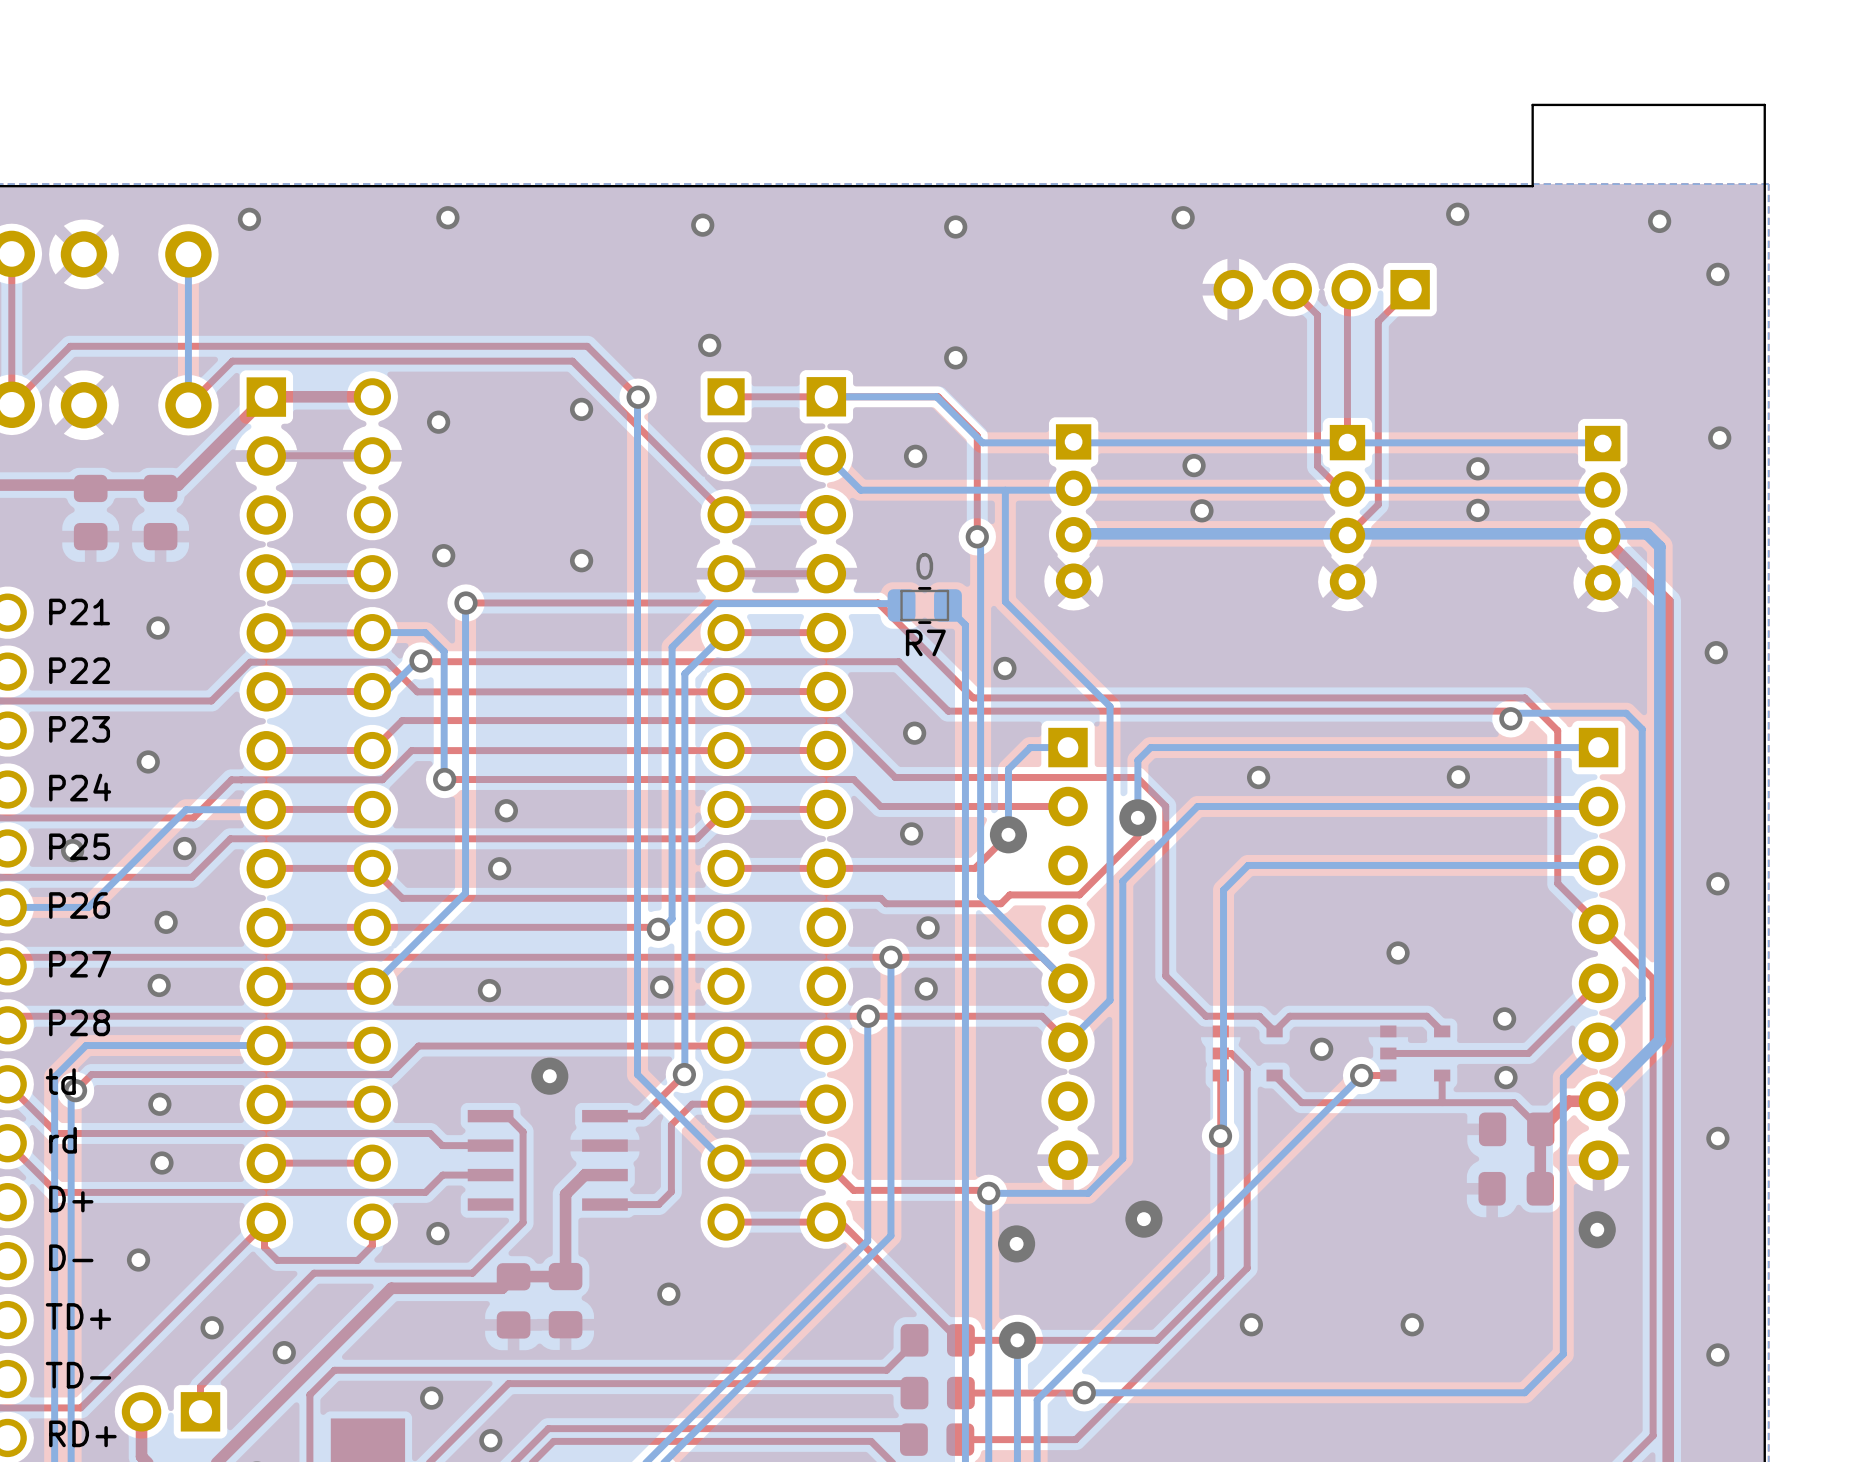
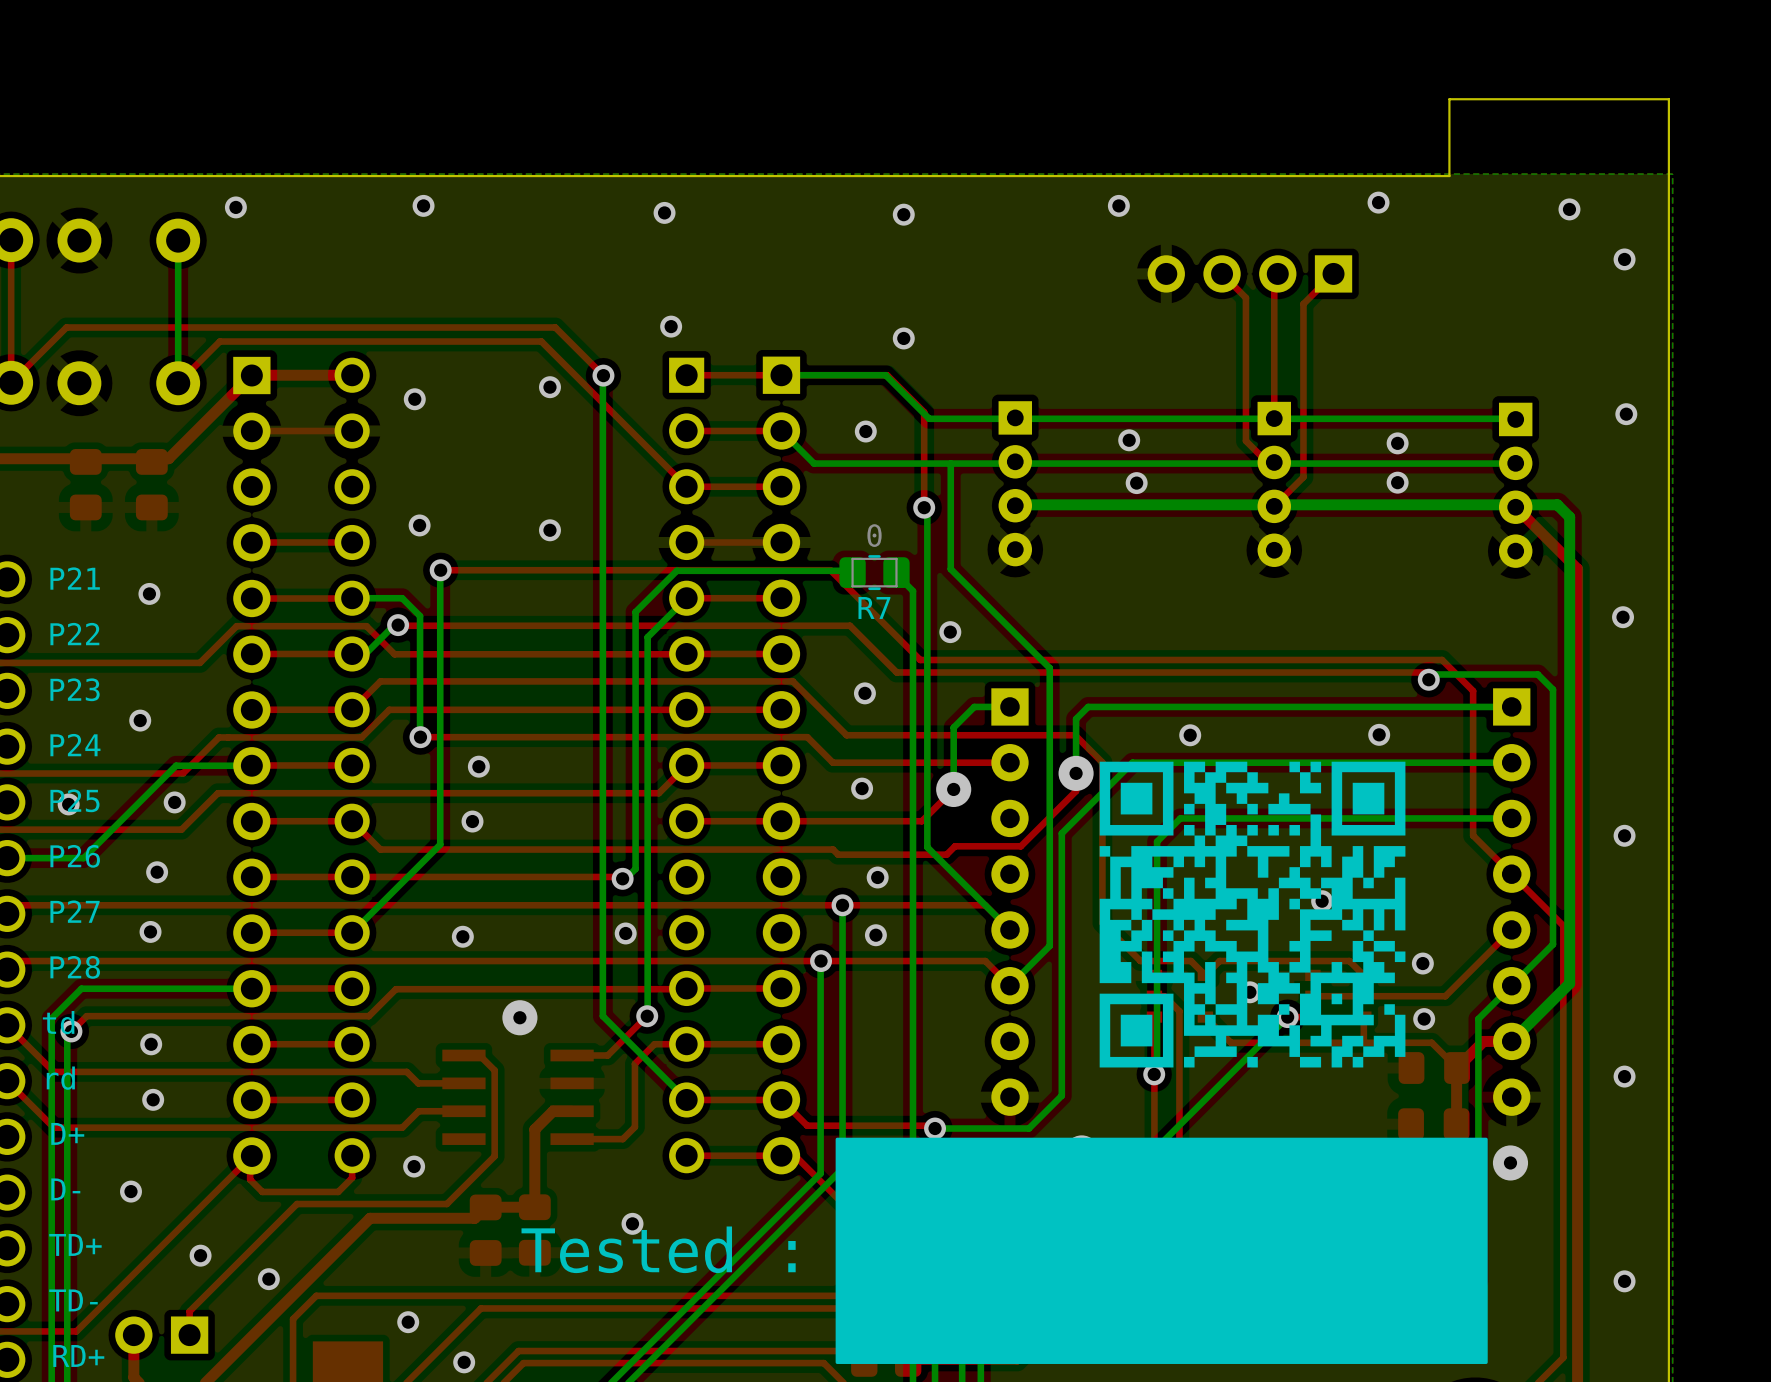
drawing: none -> [1099, 761, 1406, 1068]
drawing: none -> [835, 1137, 1488, 1364]
text: none -> Tested : (658, 1249)

